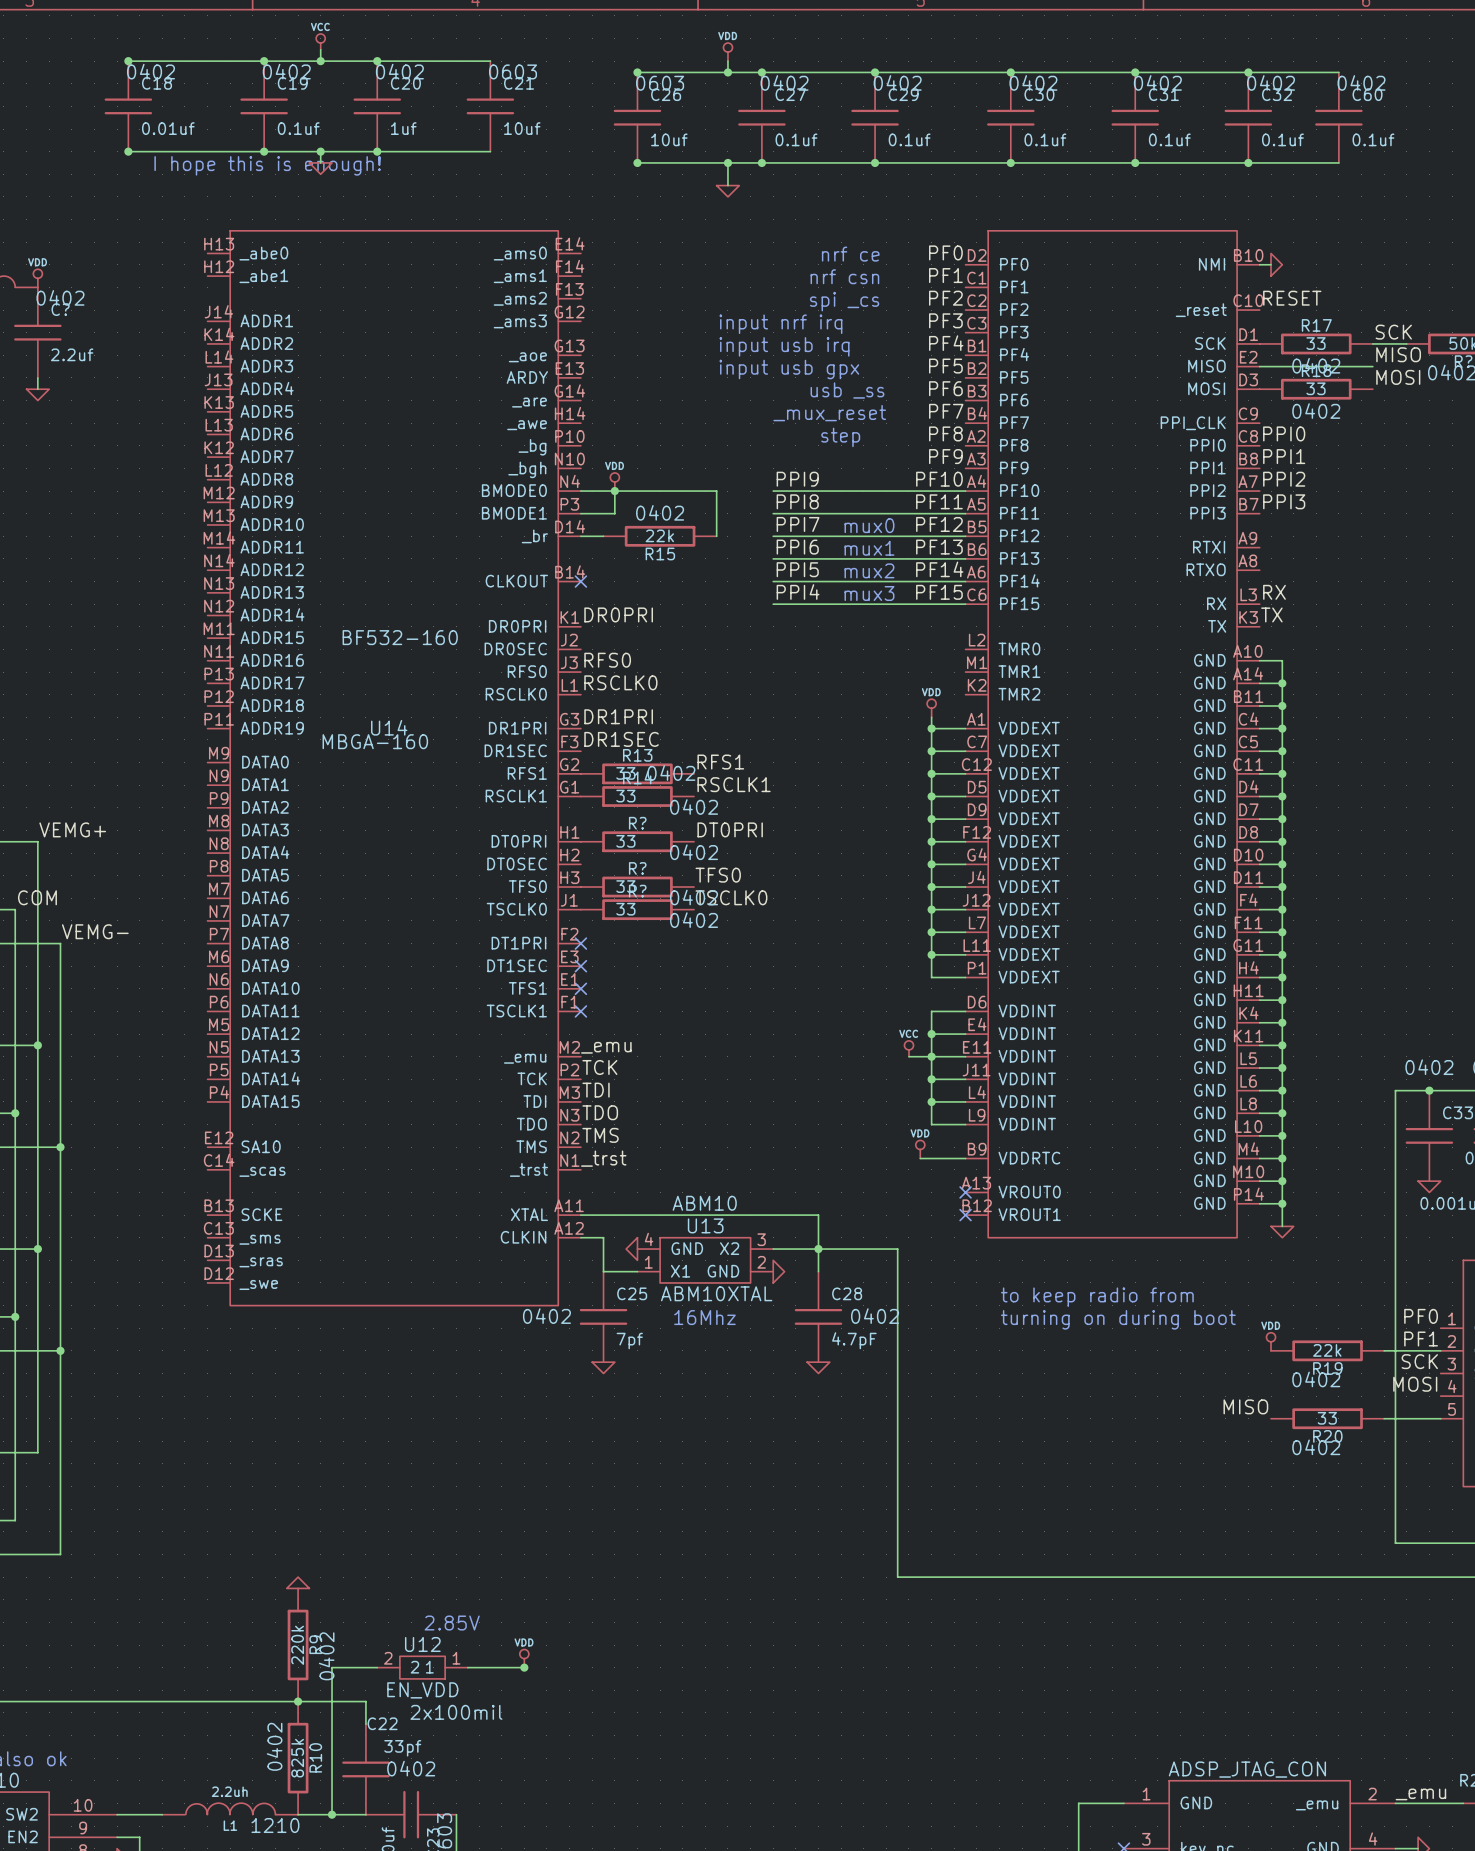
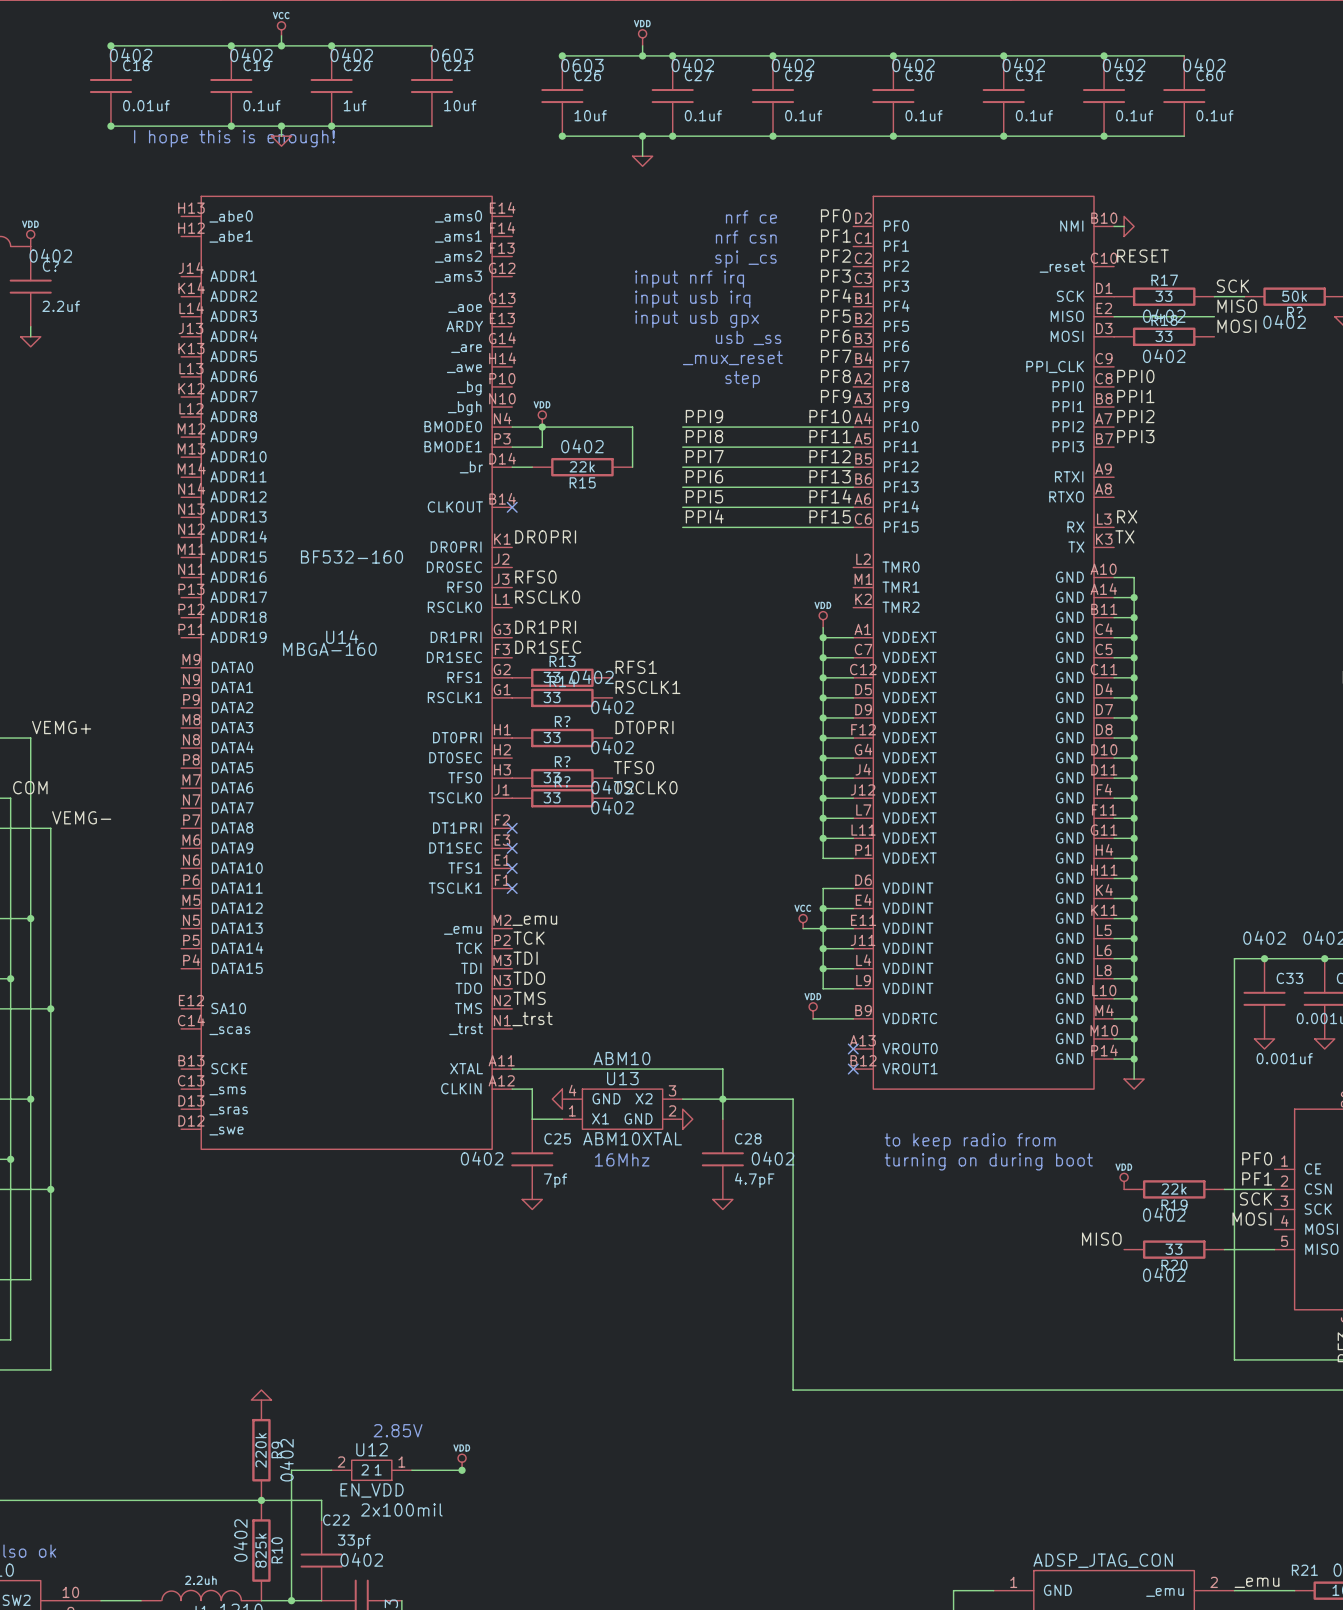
text: mux0 (869, 525) -> none
text: mux1 (869, 548) -> none
text: mux2 (869, 570) -> none
text: mux3 (869, 593) -> none

